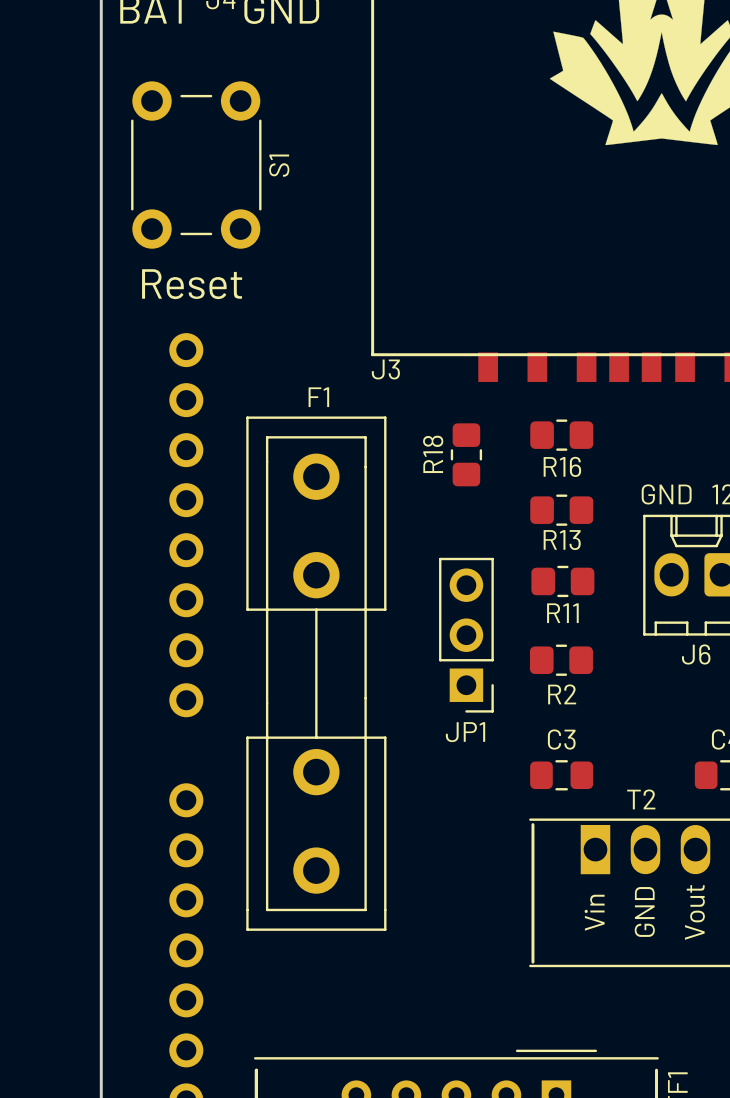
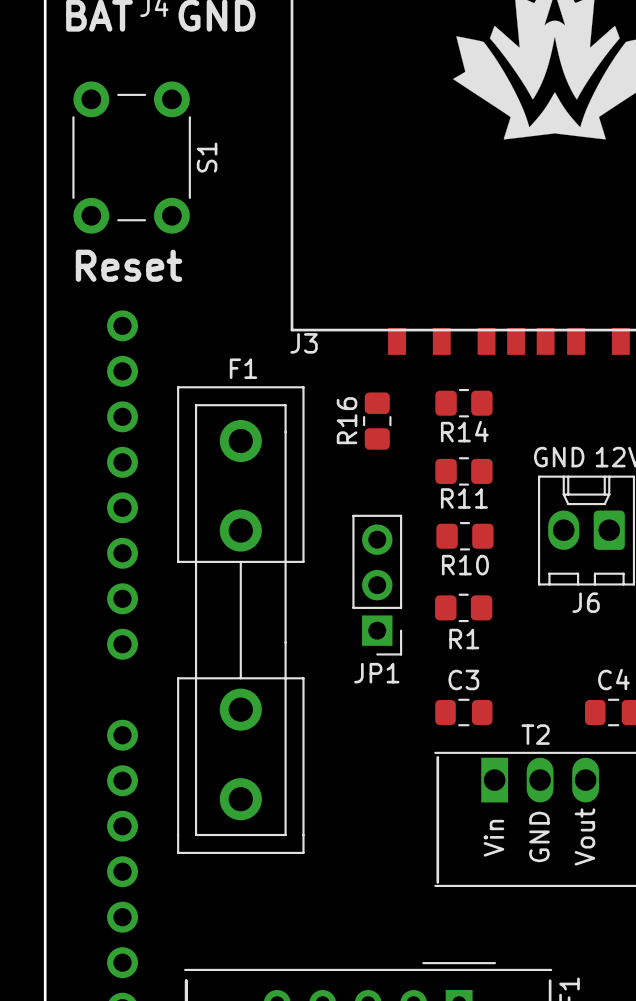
R18 name: R18 (433, 454) -> R16 (347, 420)
R16 name: R16 (562, 466) -> R14 (464, 431)
R13 name: R13 (562, 540) -> R11 (464, 498)
R11 name: R11 (562, 613) -> R10 (465, 565)
R2 name: R2 (562, 694) -> R1 (464, 639)

